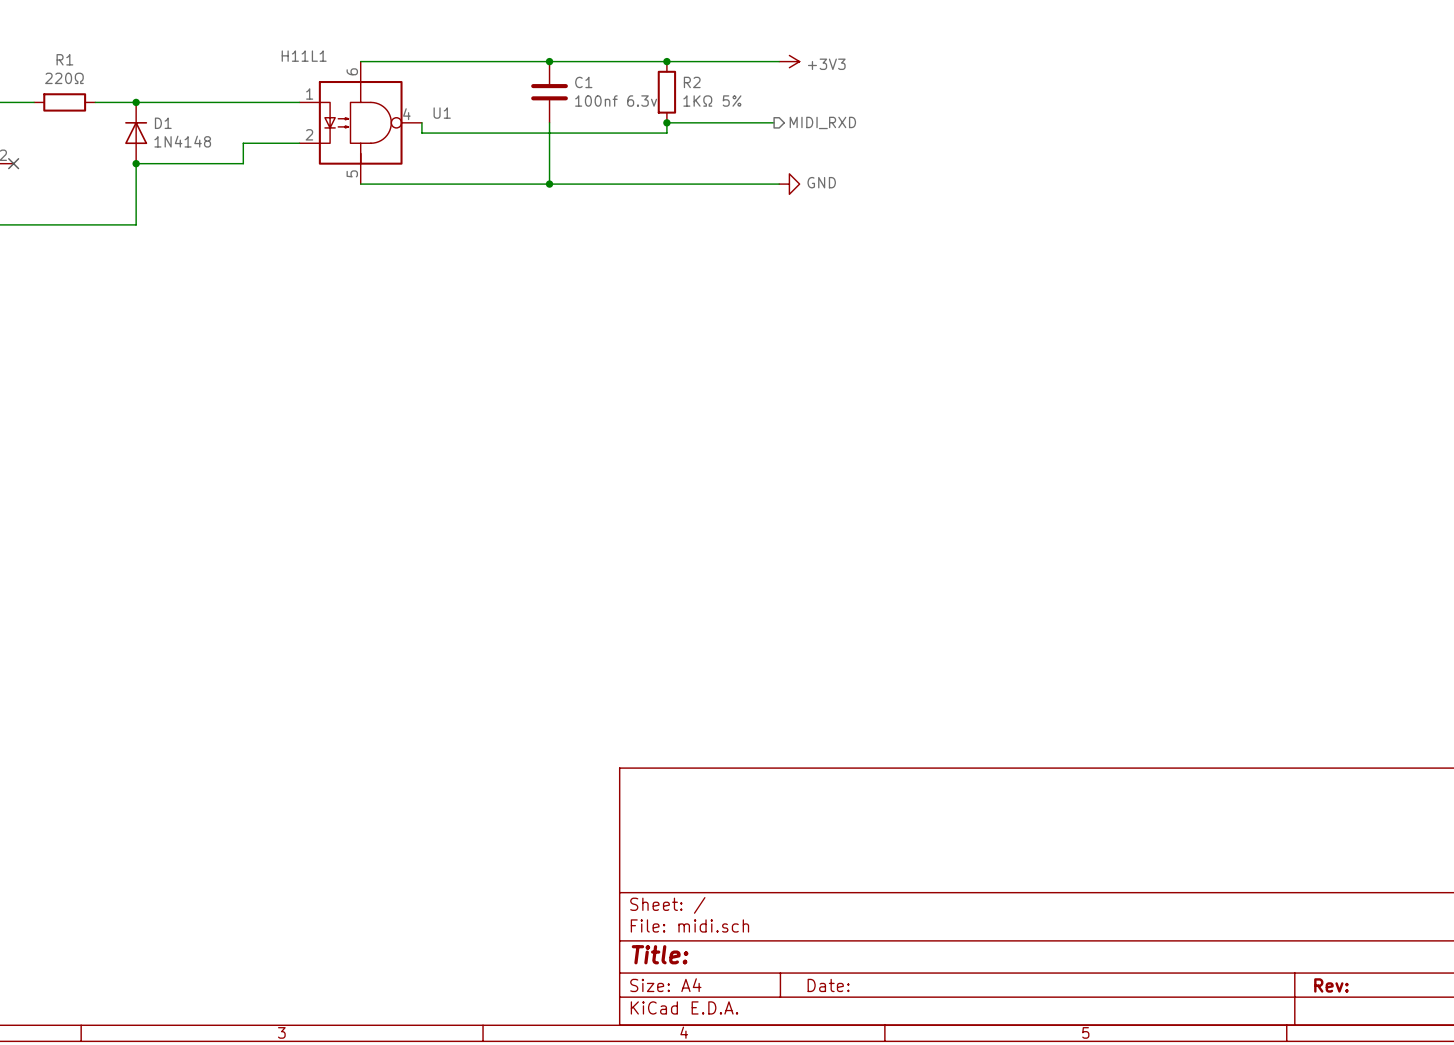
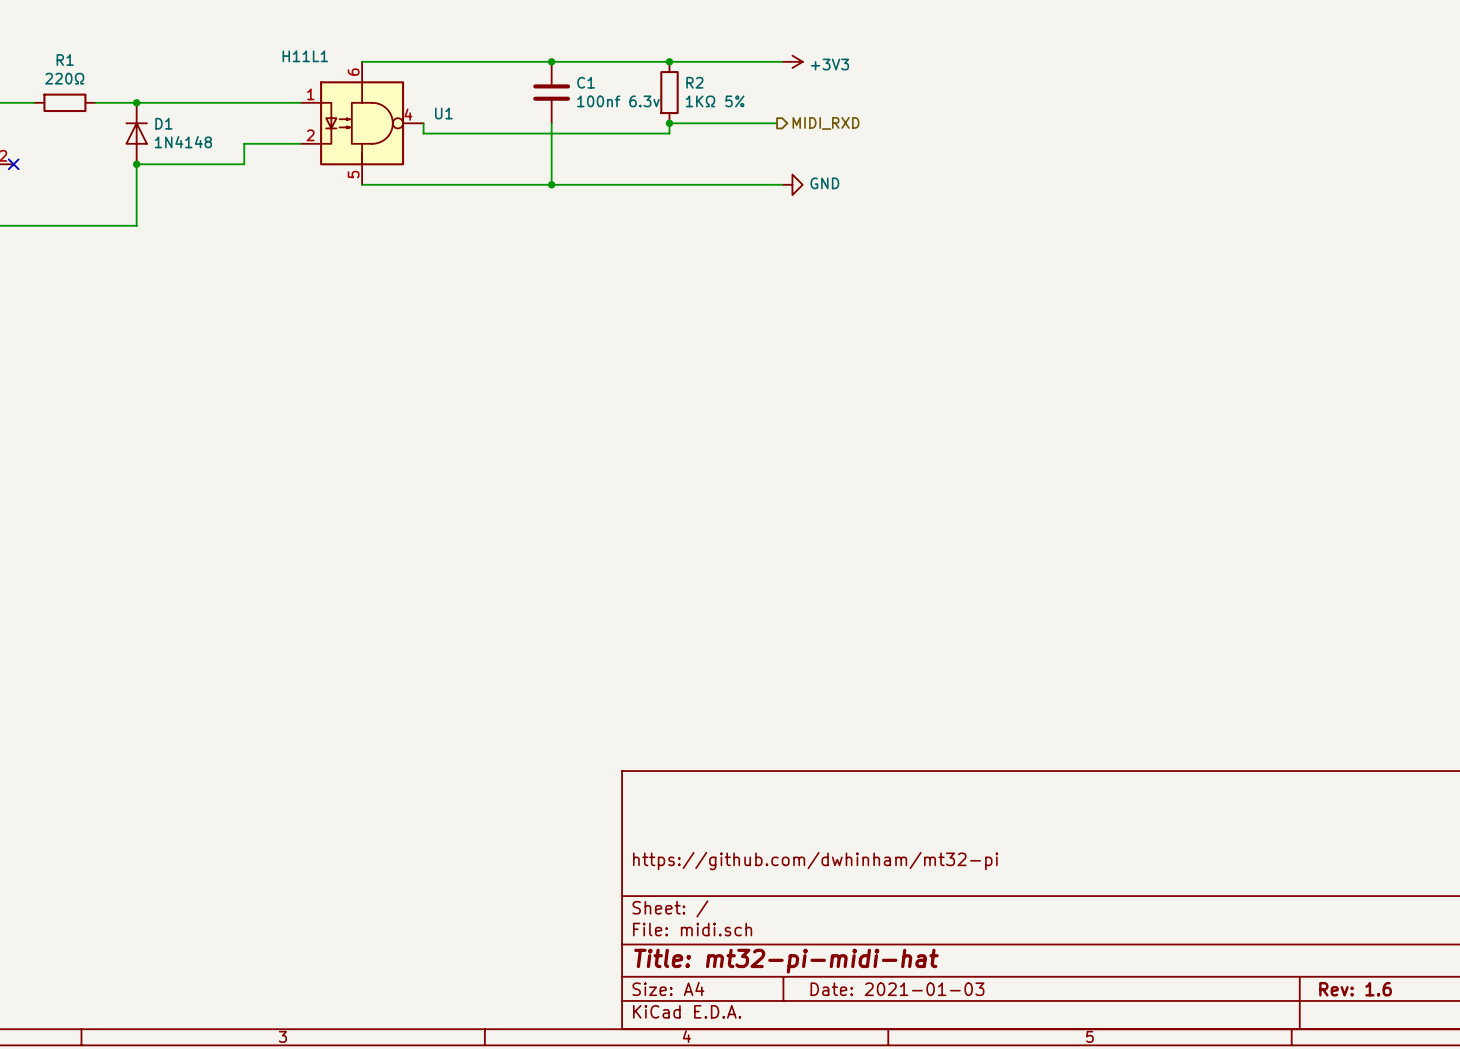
title block: none -> https://github.com/dwhinham/mt32-pi (815, 861)
title block: Title: (660, 954) -> Title: mt32-pi-midi-hat (786, 961)
title block: Date: (828, 985) -> Date: 2021-01-03 (897, 989)
title block: Rev: (1331, 985) -> Rev: 1.6 (1355, 989)

